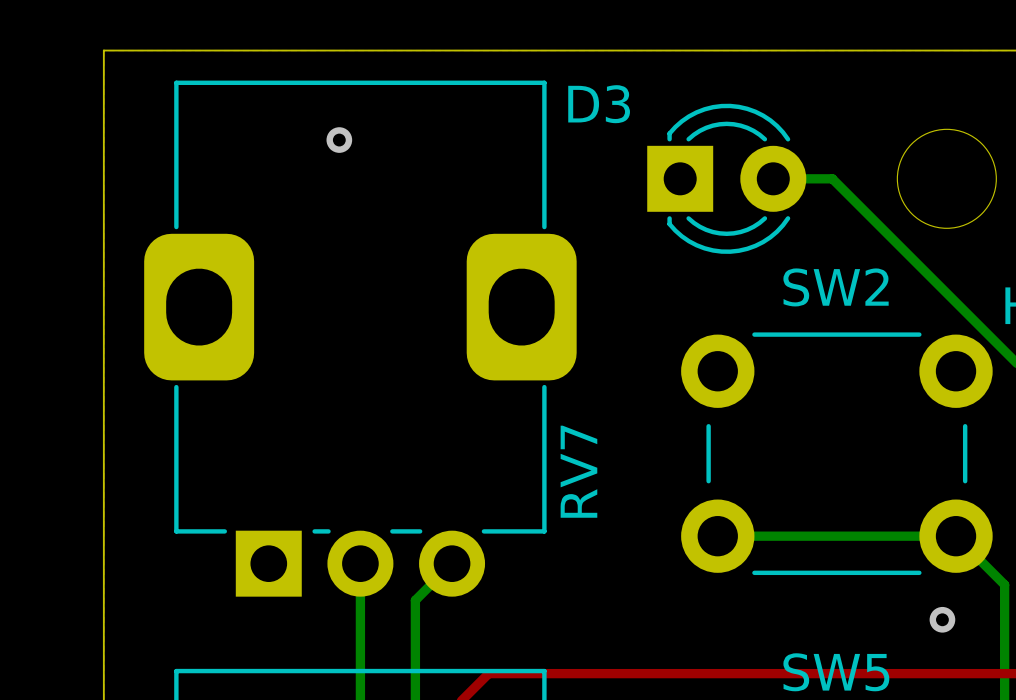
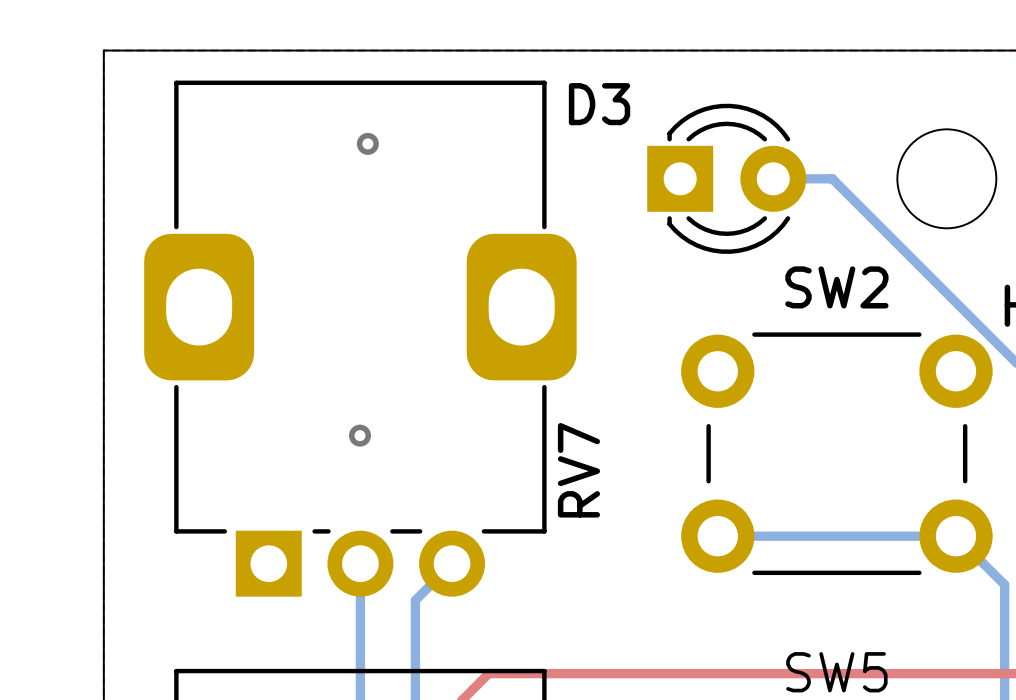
via: (339, 140) -> none
via: none -> (367, 143)
via: none -> (359, 435)
via: (942, 619) -> none

